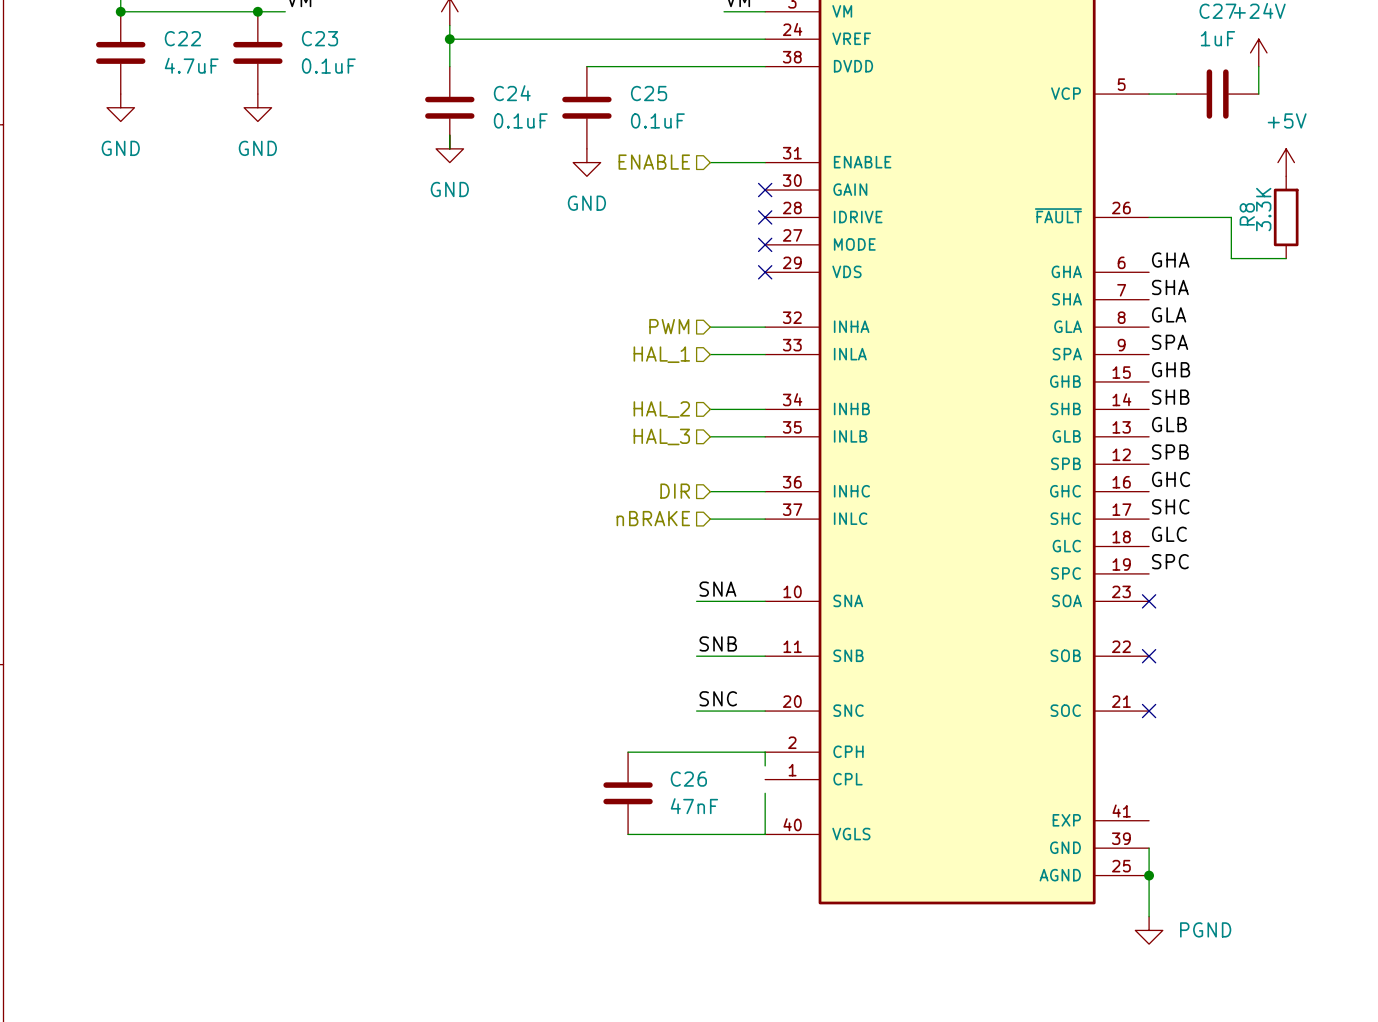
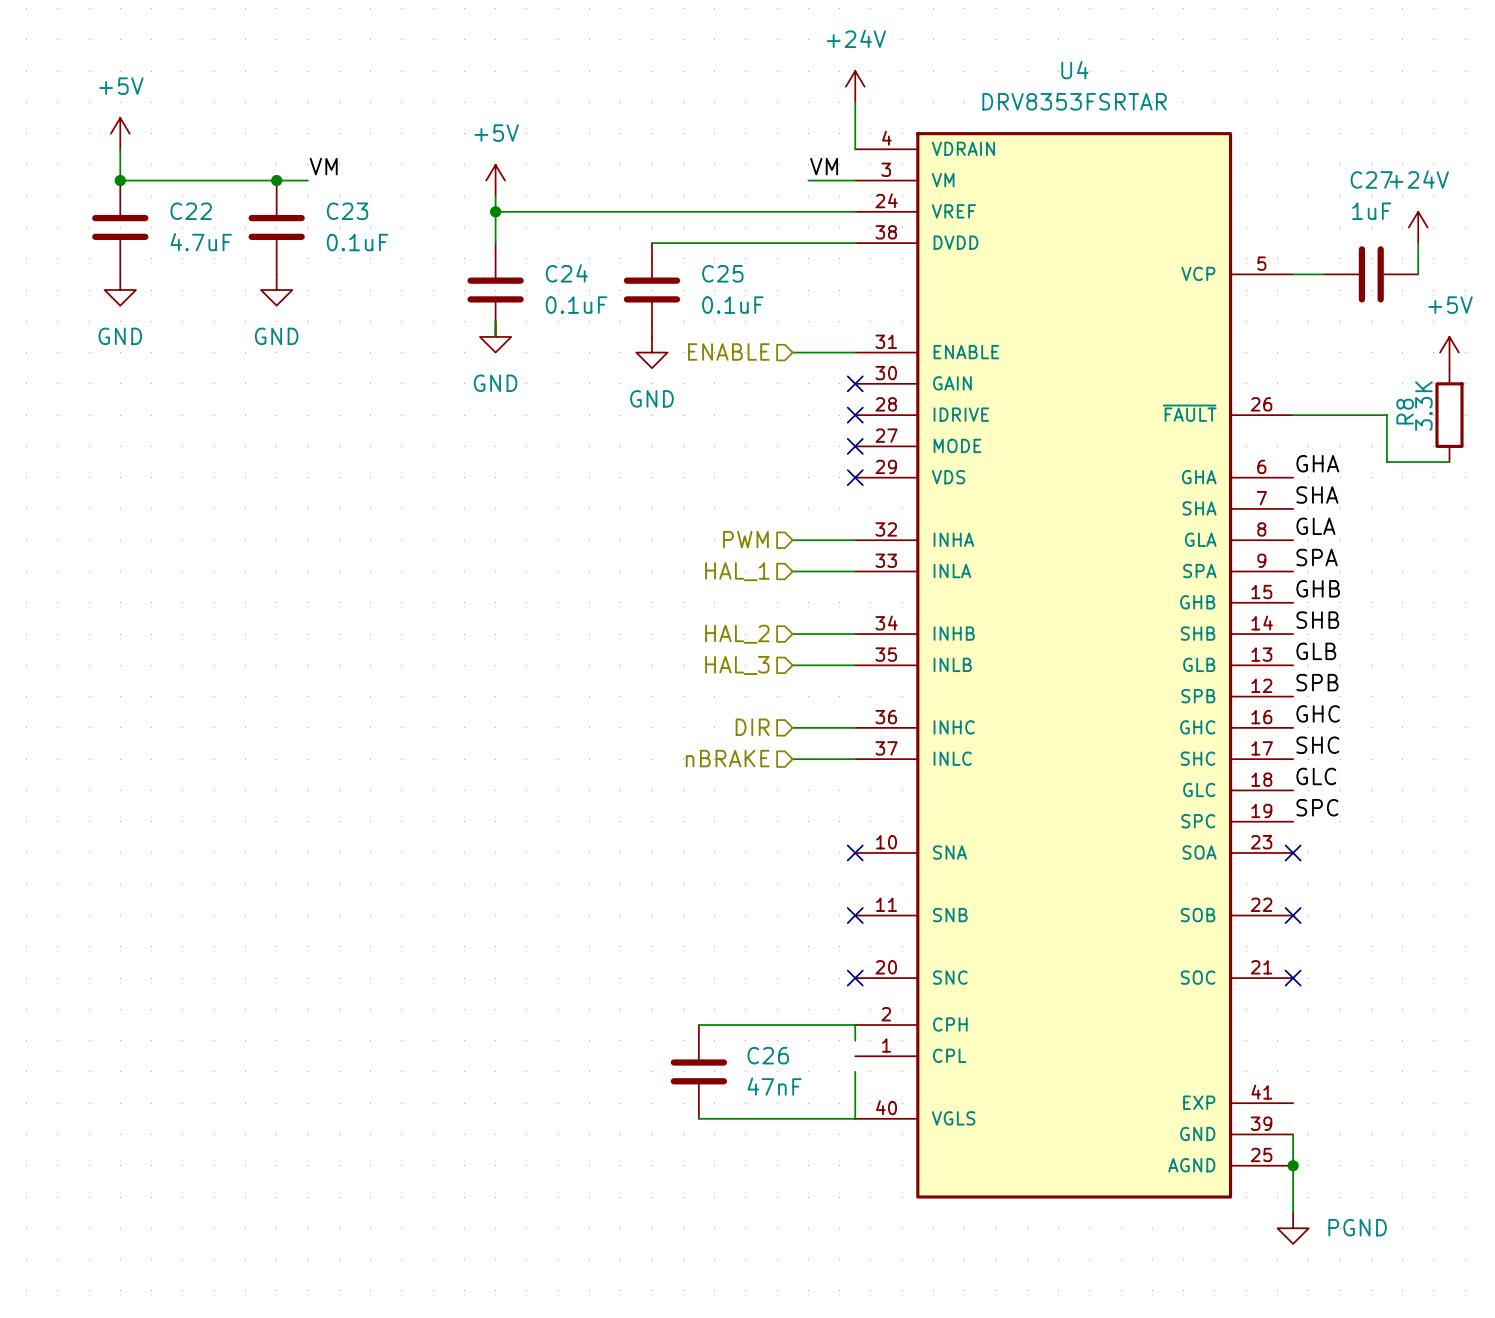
label: SNA (717, 589) -> none
wire: (696, 601) (765, 601) -> none
no-connect mark: none -> (855, 852)
label: SNB (718, 643) -> none
wire: (696, 656) (765, 656) -> none
no-connect mark: none -> (855, 915)
label: SNC (718, 698) -> none
wire: (696, 711) (765, 711) -> none
no-connect mark: none -> (855, 978)

